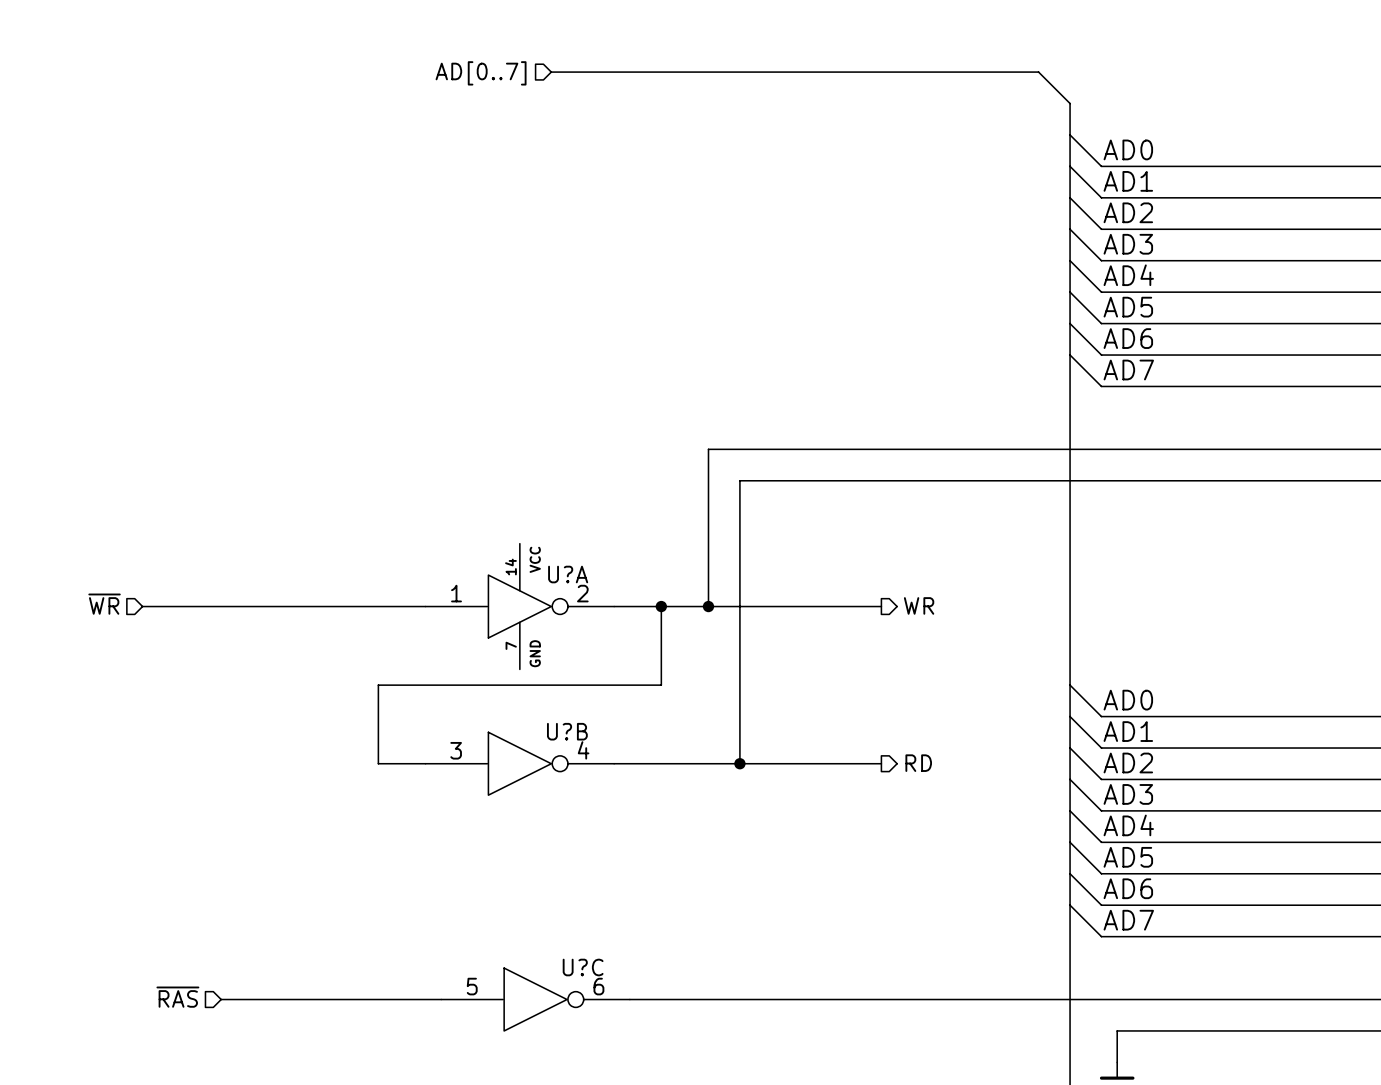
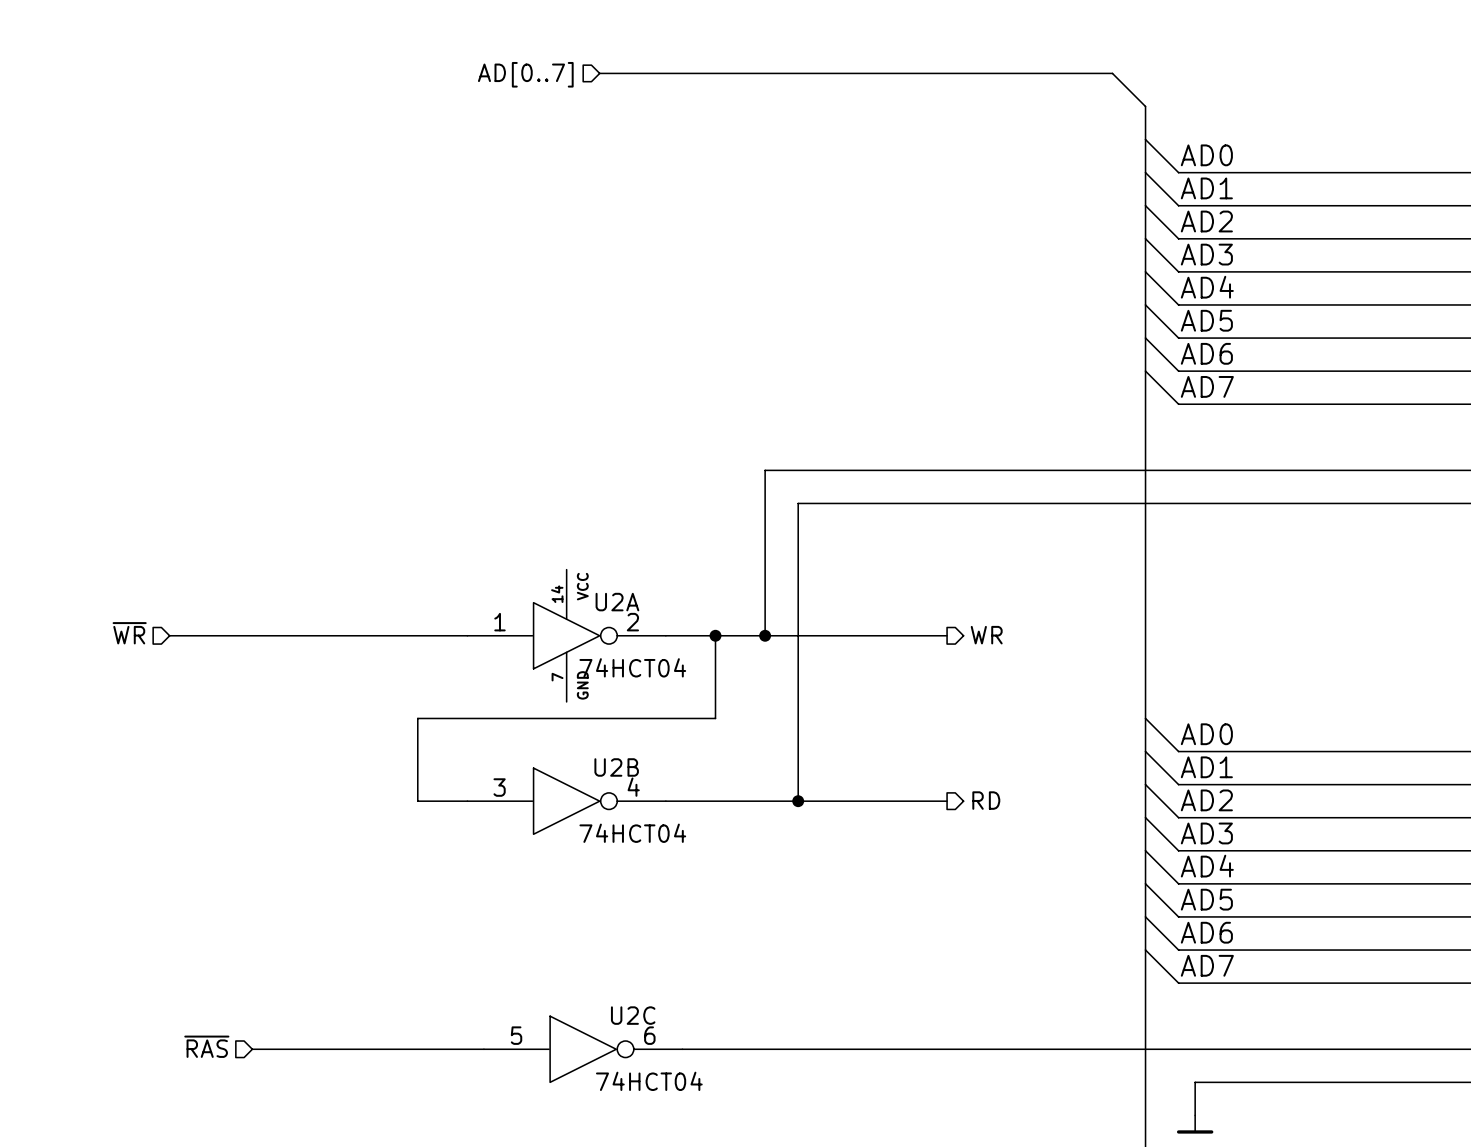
U?A name: U?A (568, 574) -> U2A (617, 602)
U?A value: none -> 74HCT04 (632, 667)
U?B name: U?B (567, 731) -> U2B (616, 767)
U?B value: none -> 74HCT04 (632, 833)
U?C name: U?C (583, 967) -> U2C (633, 1015)
U?C value: none -> 74HCT04 (649, 1081)

